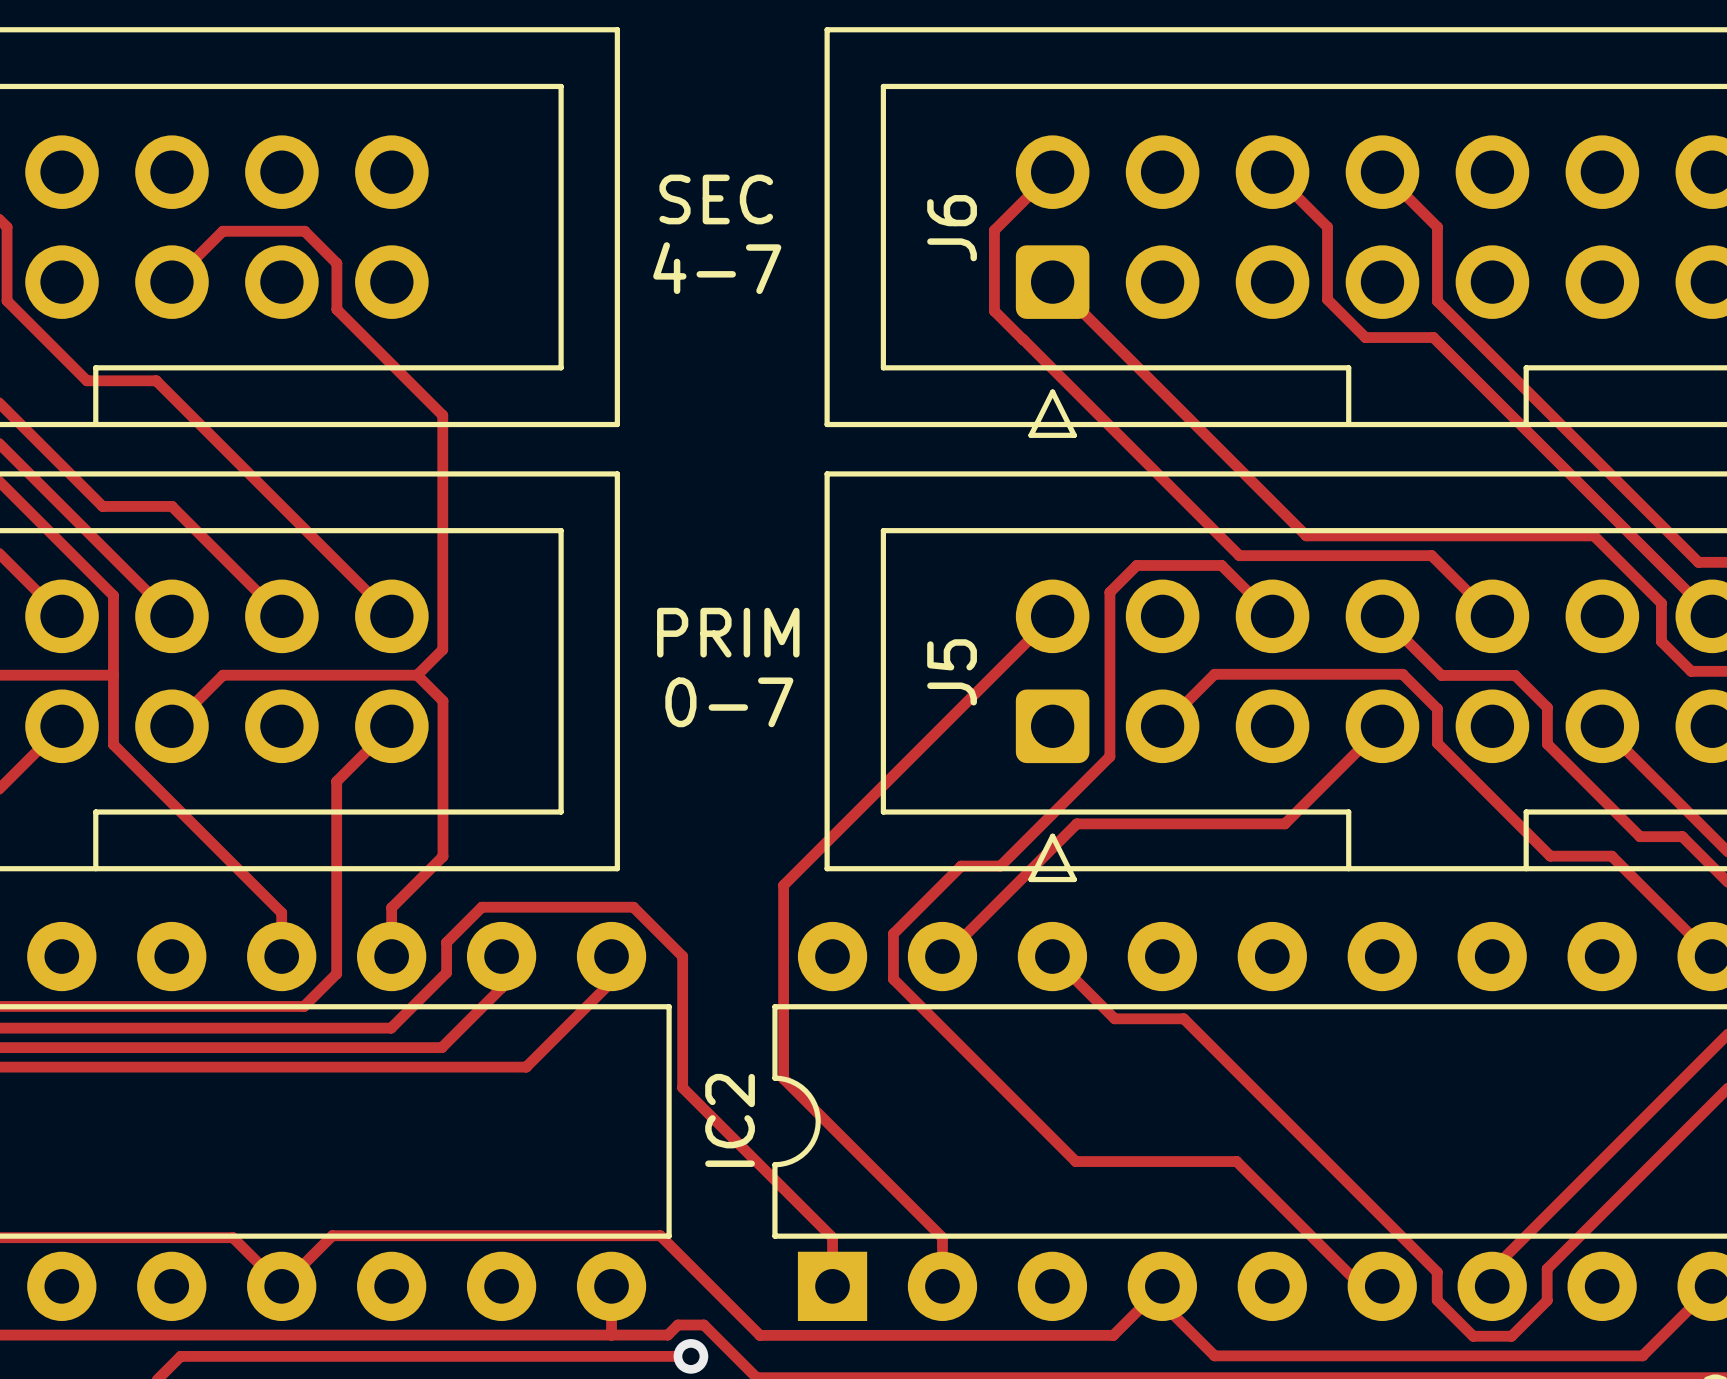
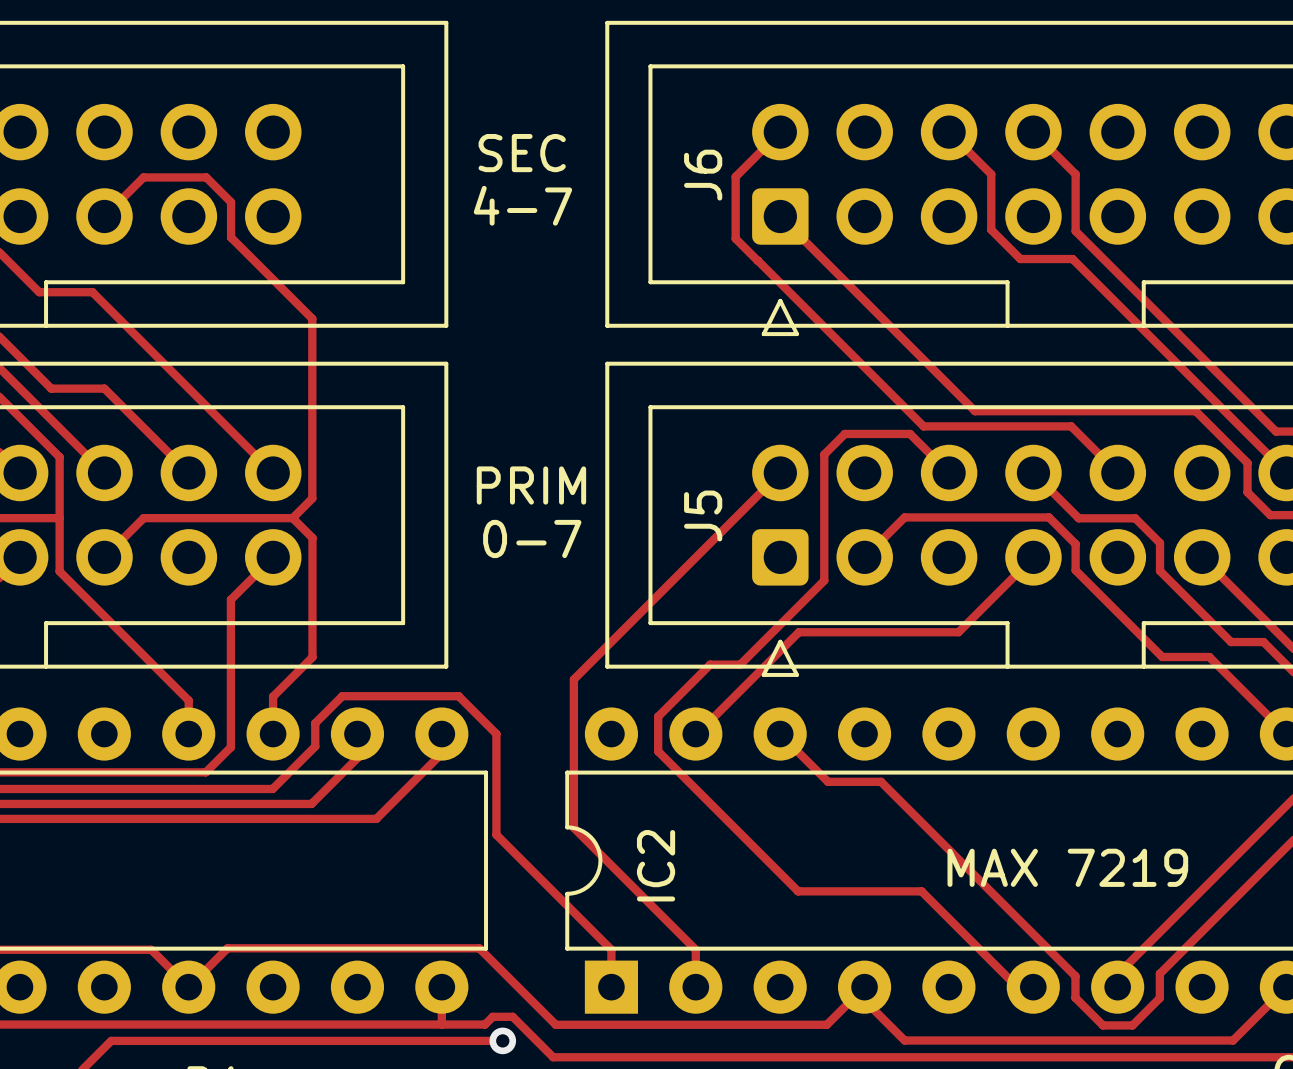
IC2 name position: IC2 (730, 1120) -> IC2 (656, 865)
IC2 text: none -> MAX 7219 (1067, 867)

